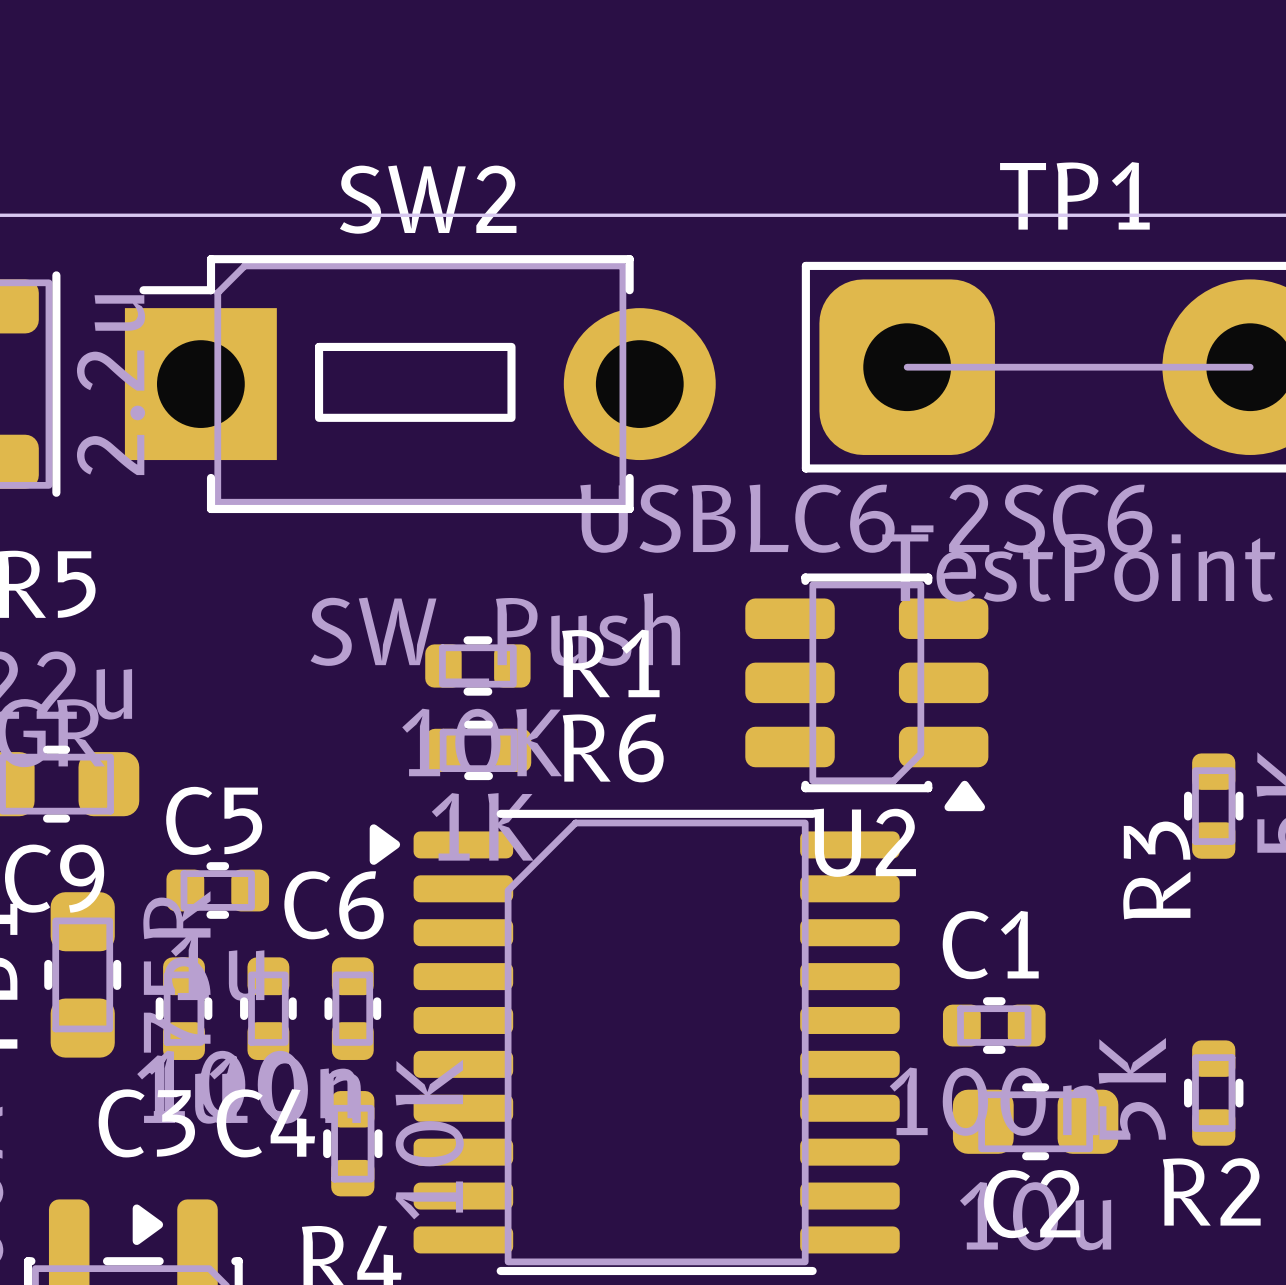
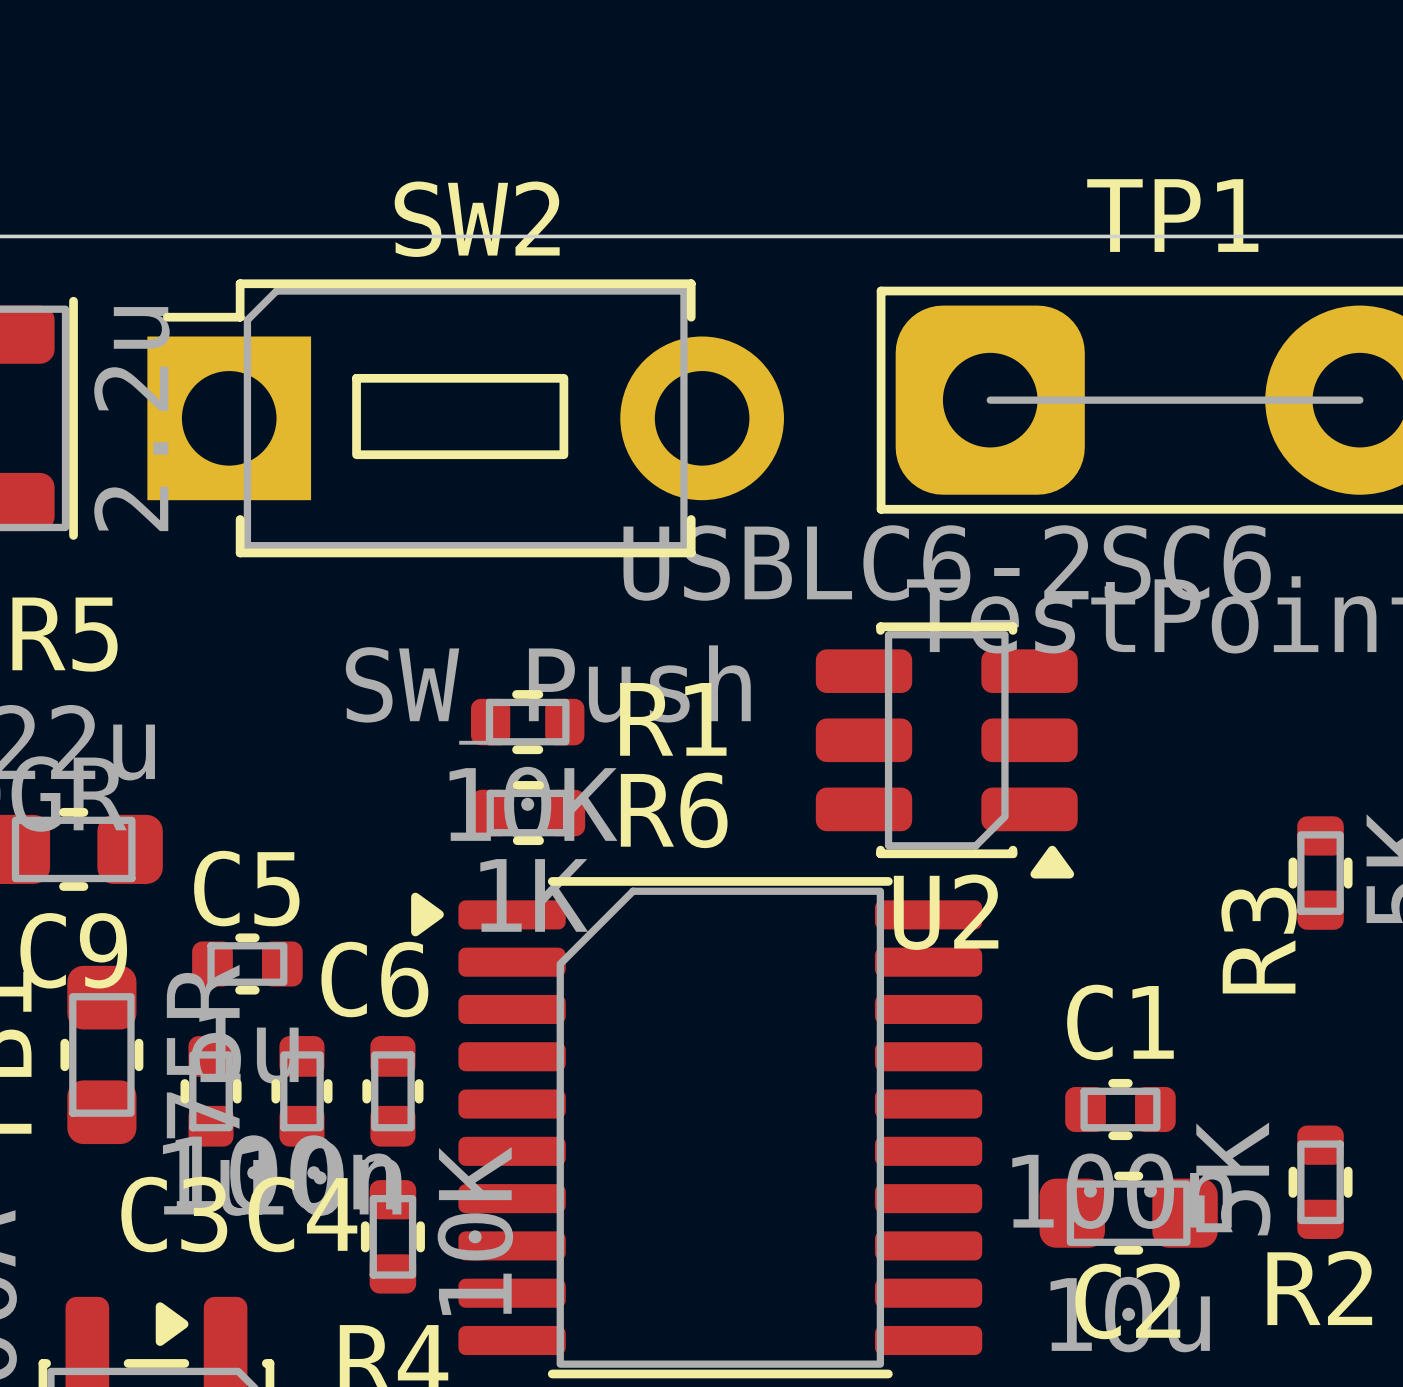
C1 position: (994, 1025) -> (1120, 1109)

